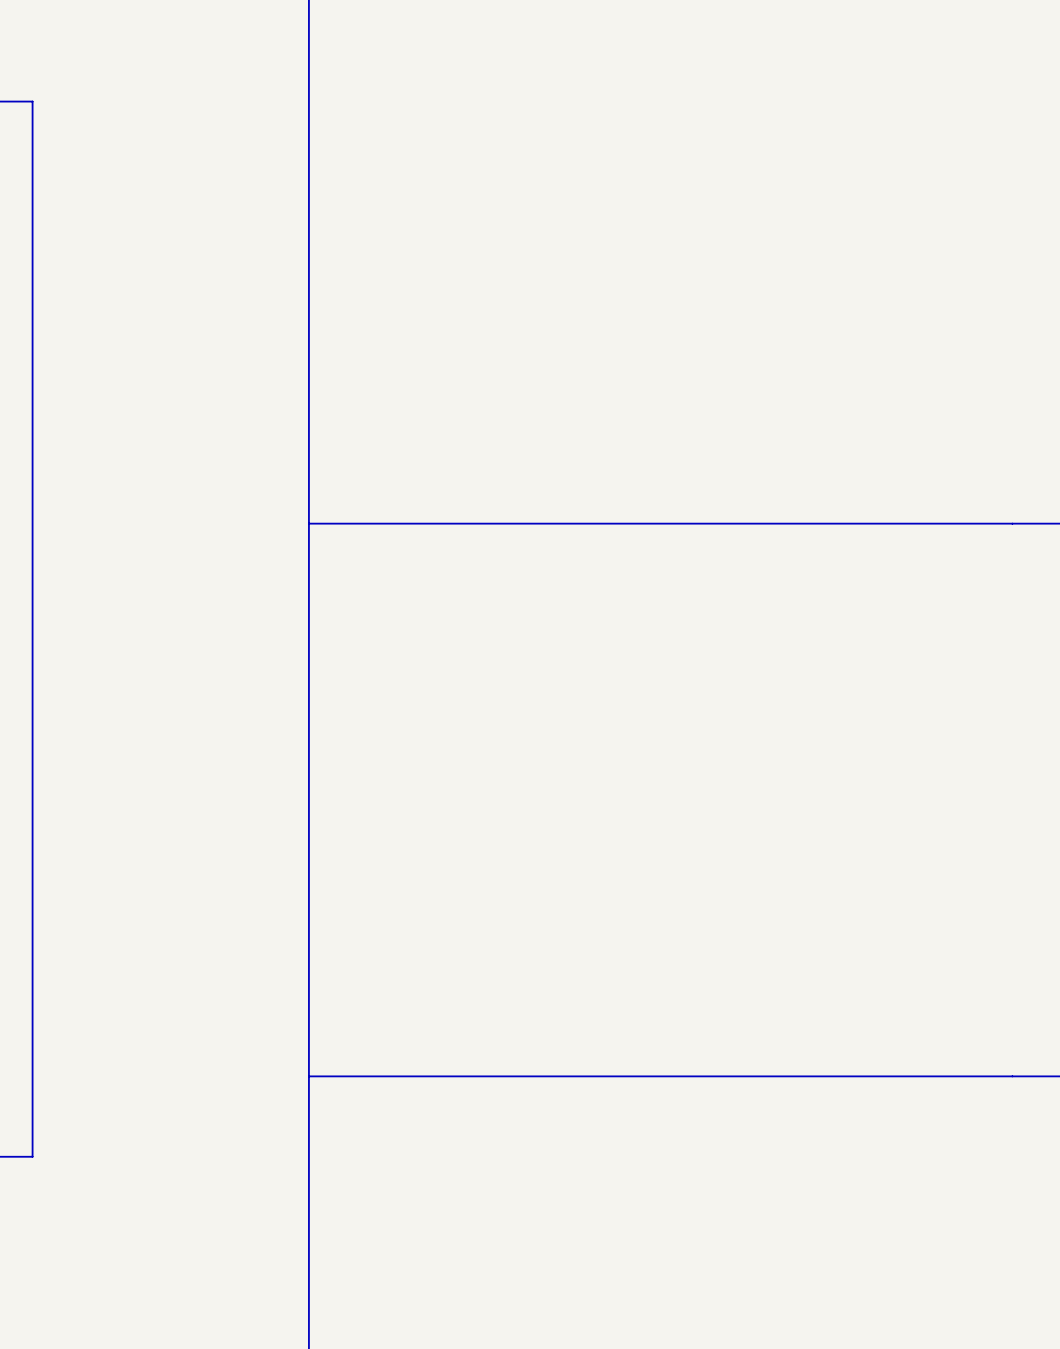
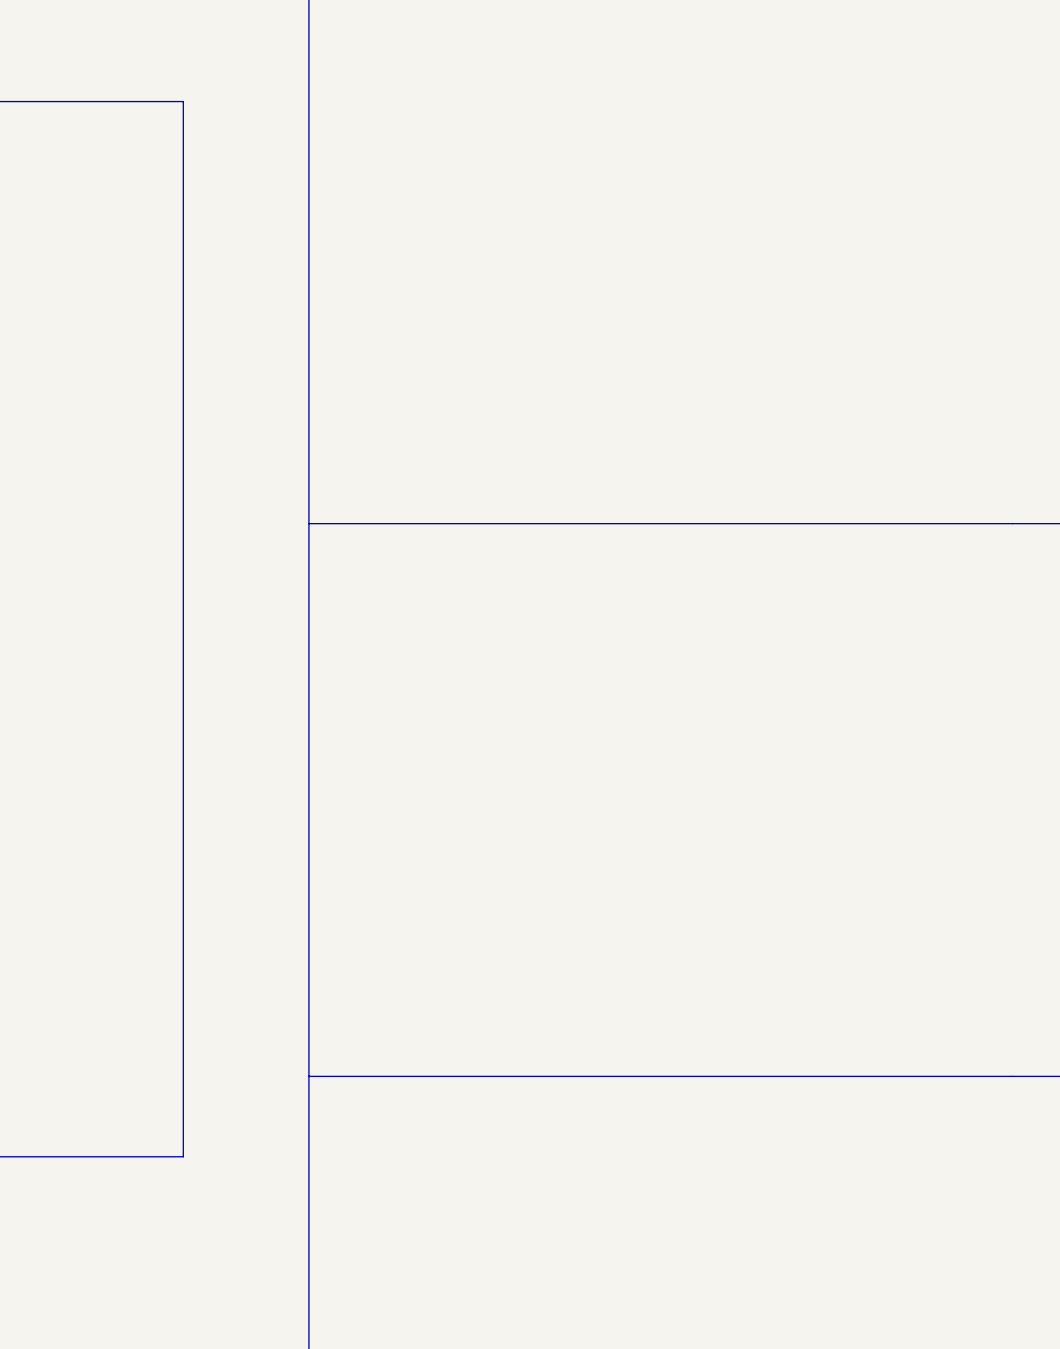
line: (32, 101) (32, 1156) -> (32, 101) (183, 101) (183, 1156) (32, 1156)

